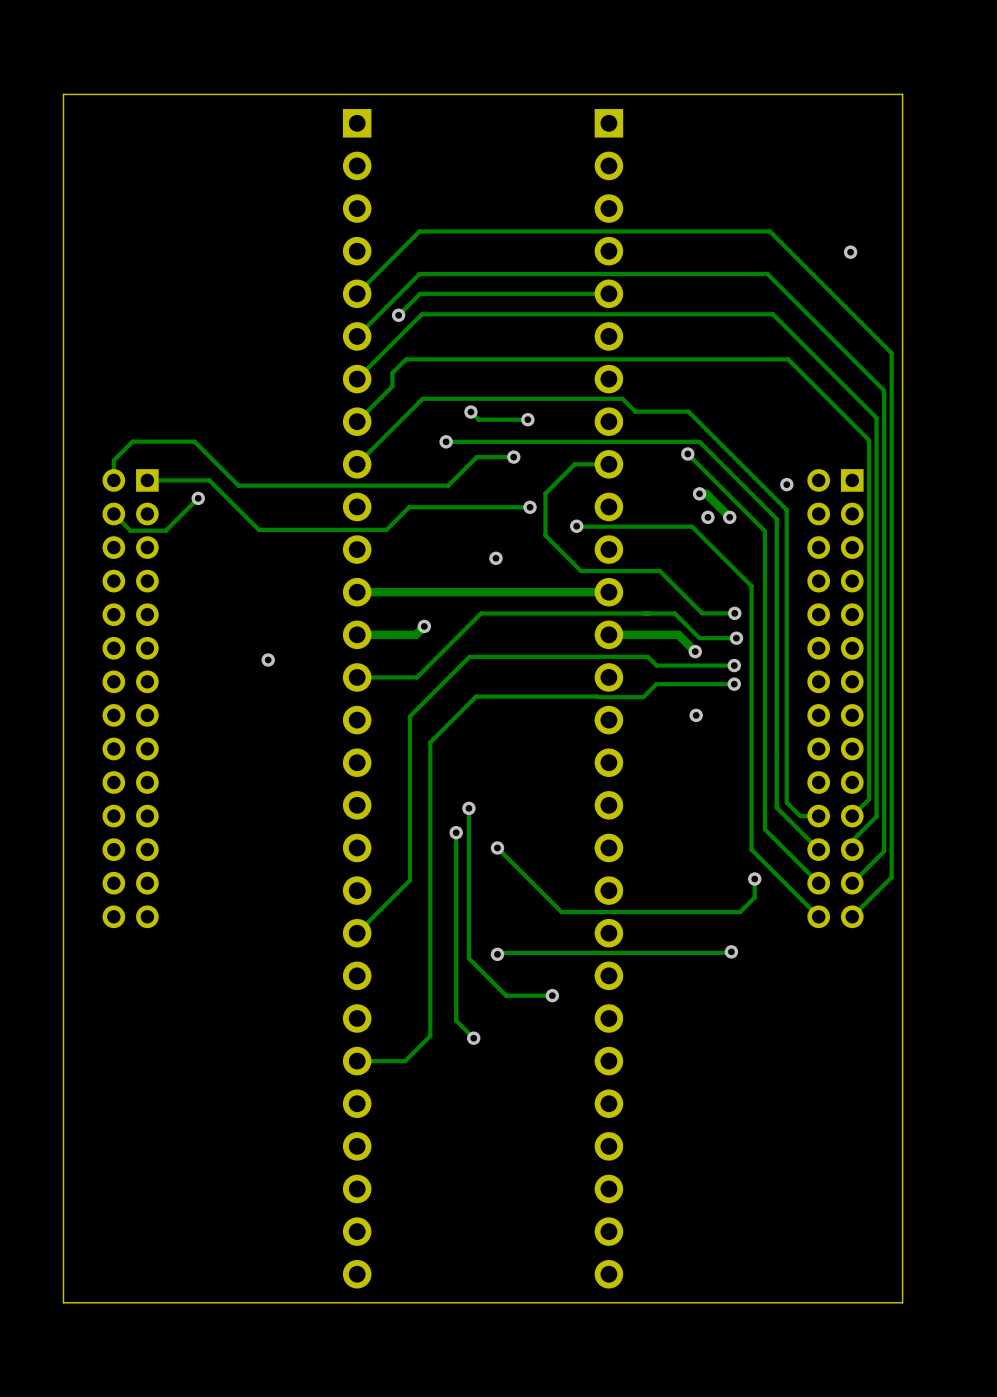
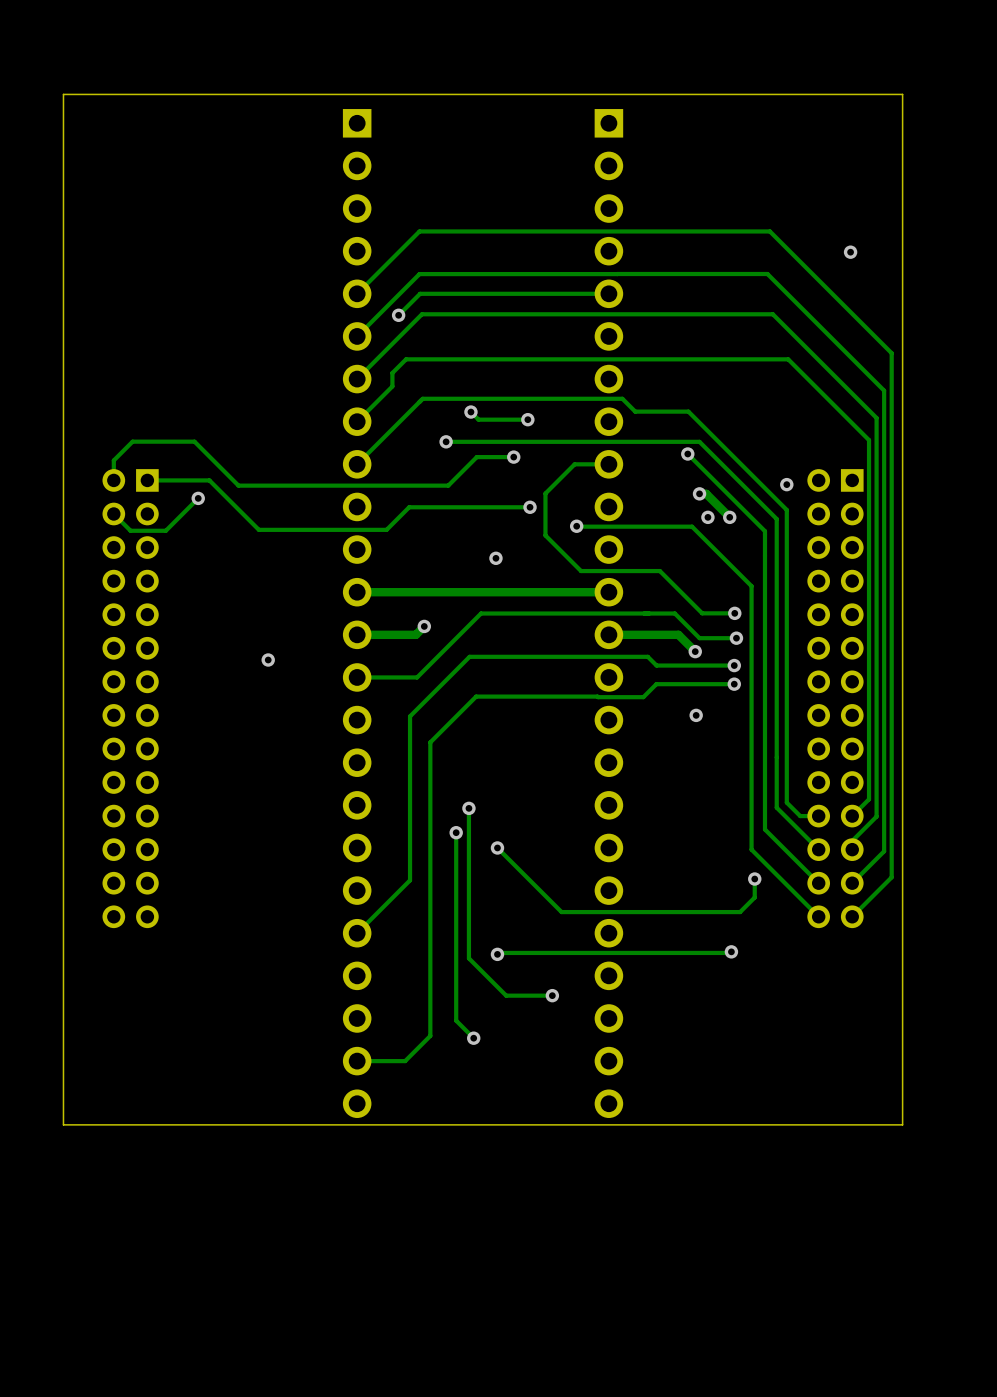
part: (357, 698) -> none
part: (608, 698) -> none
board edge: (902, 1124) (902, 1302) (63, 1302) (63, 1124) -> (902, 1124) (63, 1124)

